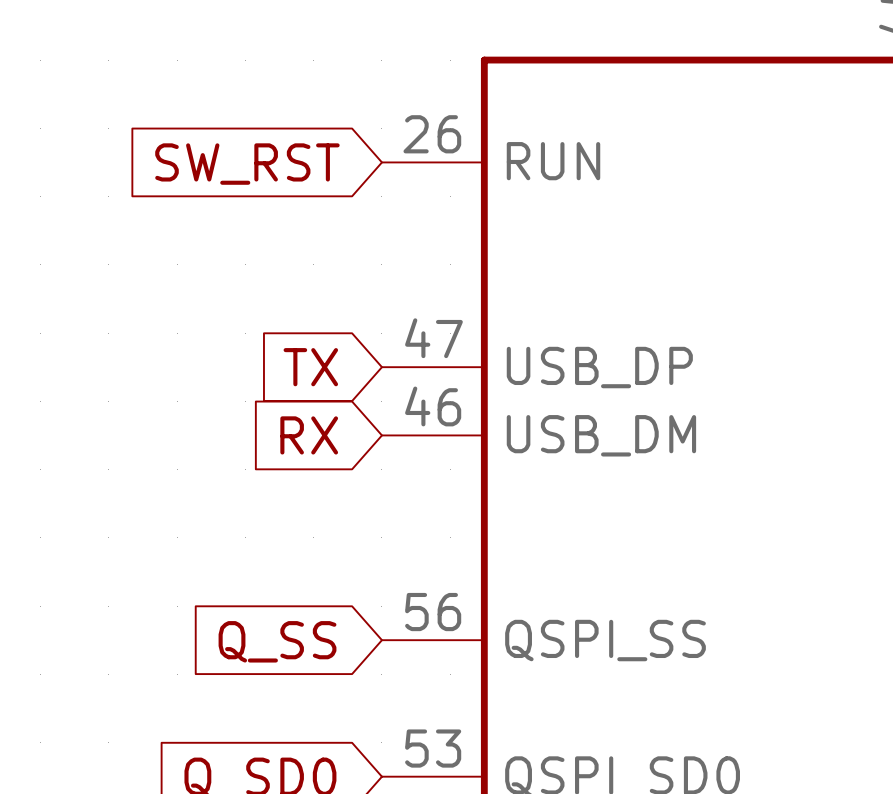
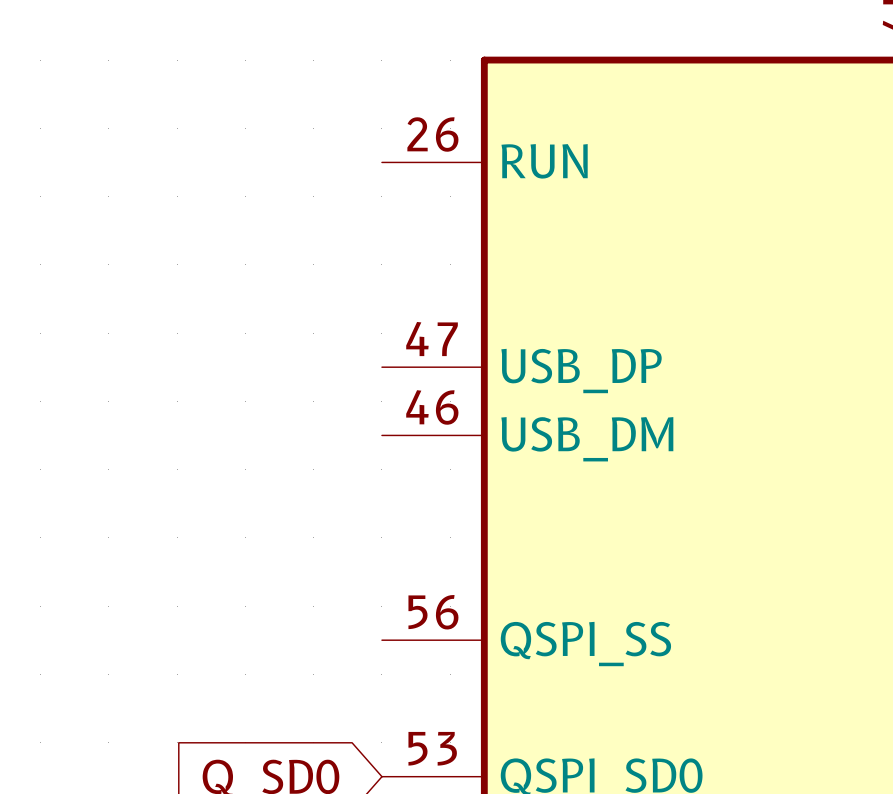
global label: SW_RST (247, 164) -> none
global label: TX (310, 367) -> none
global label: RX (309, 435) -> none
global label: Q_SS (277, 641) -> none

